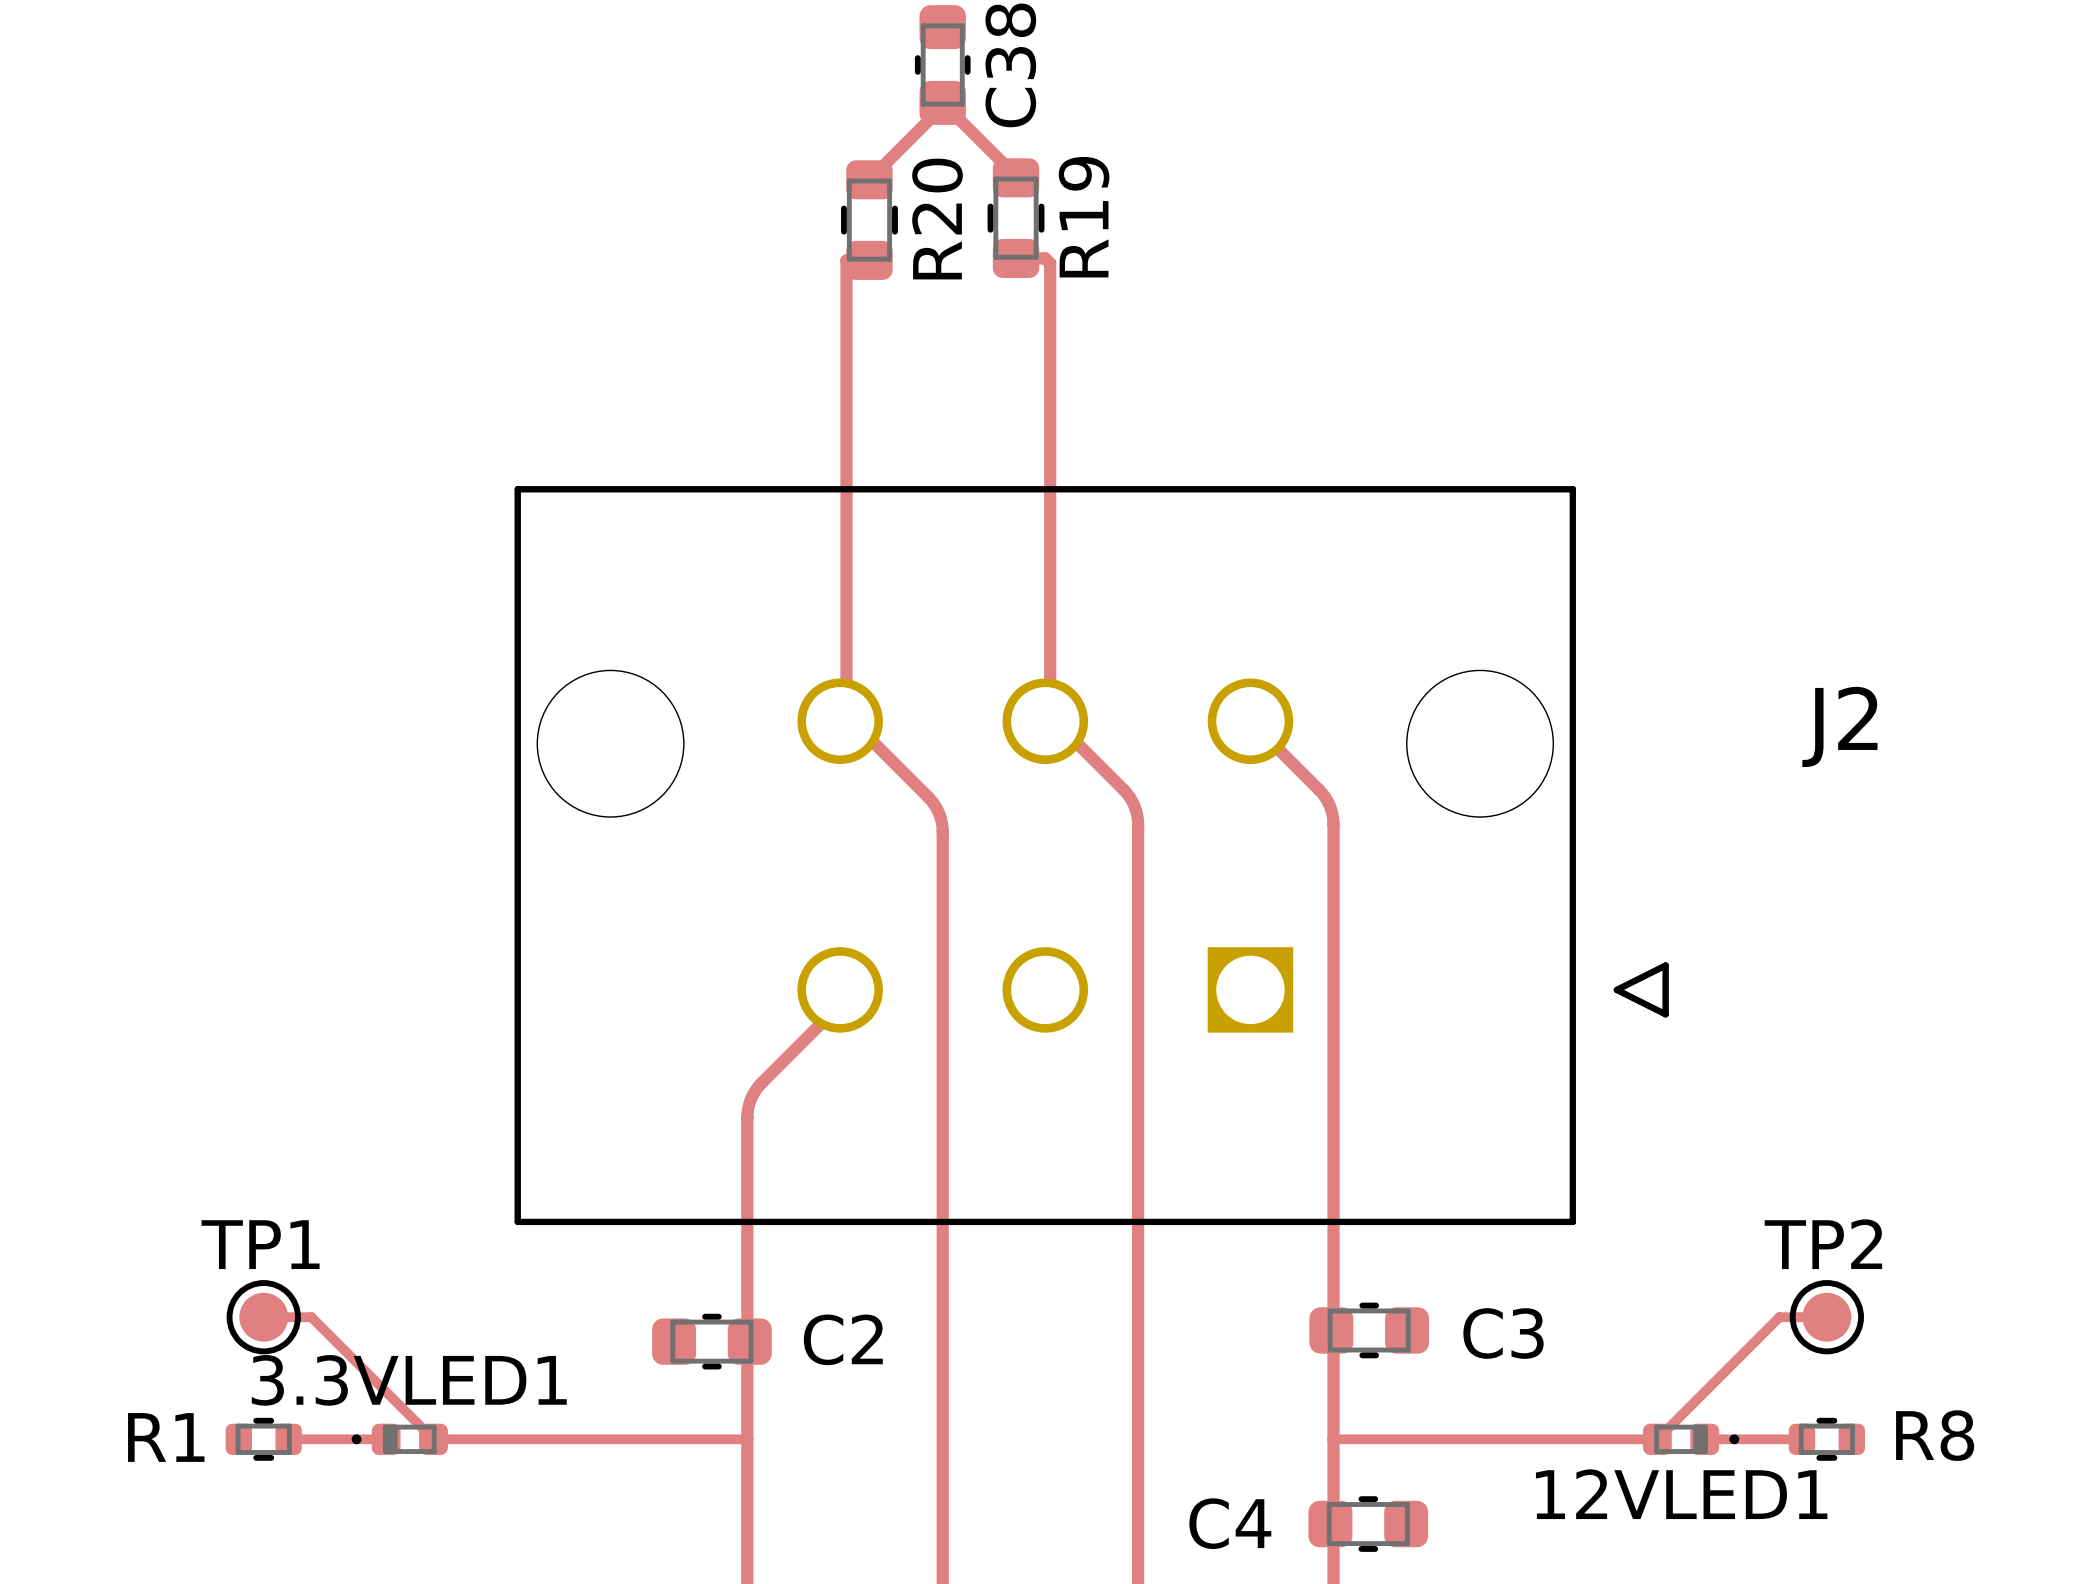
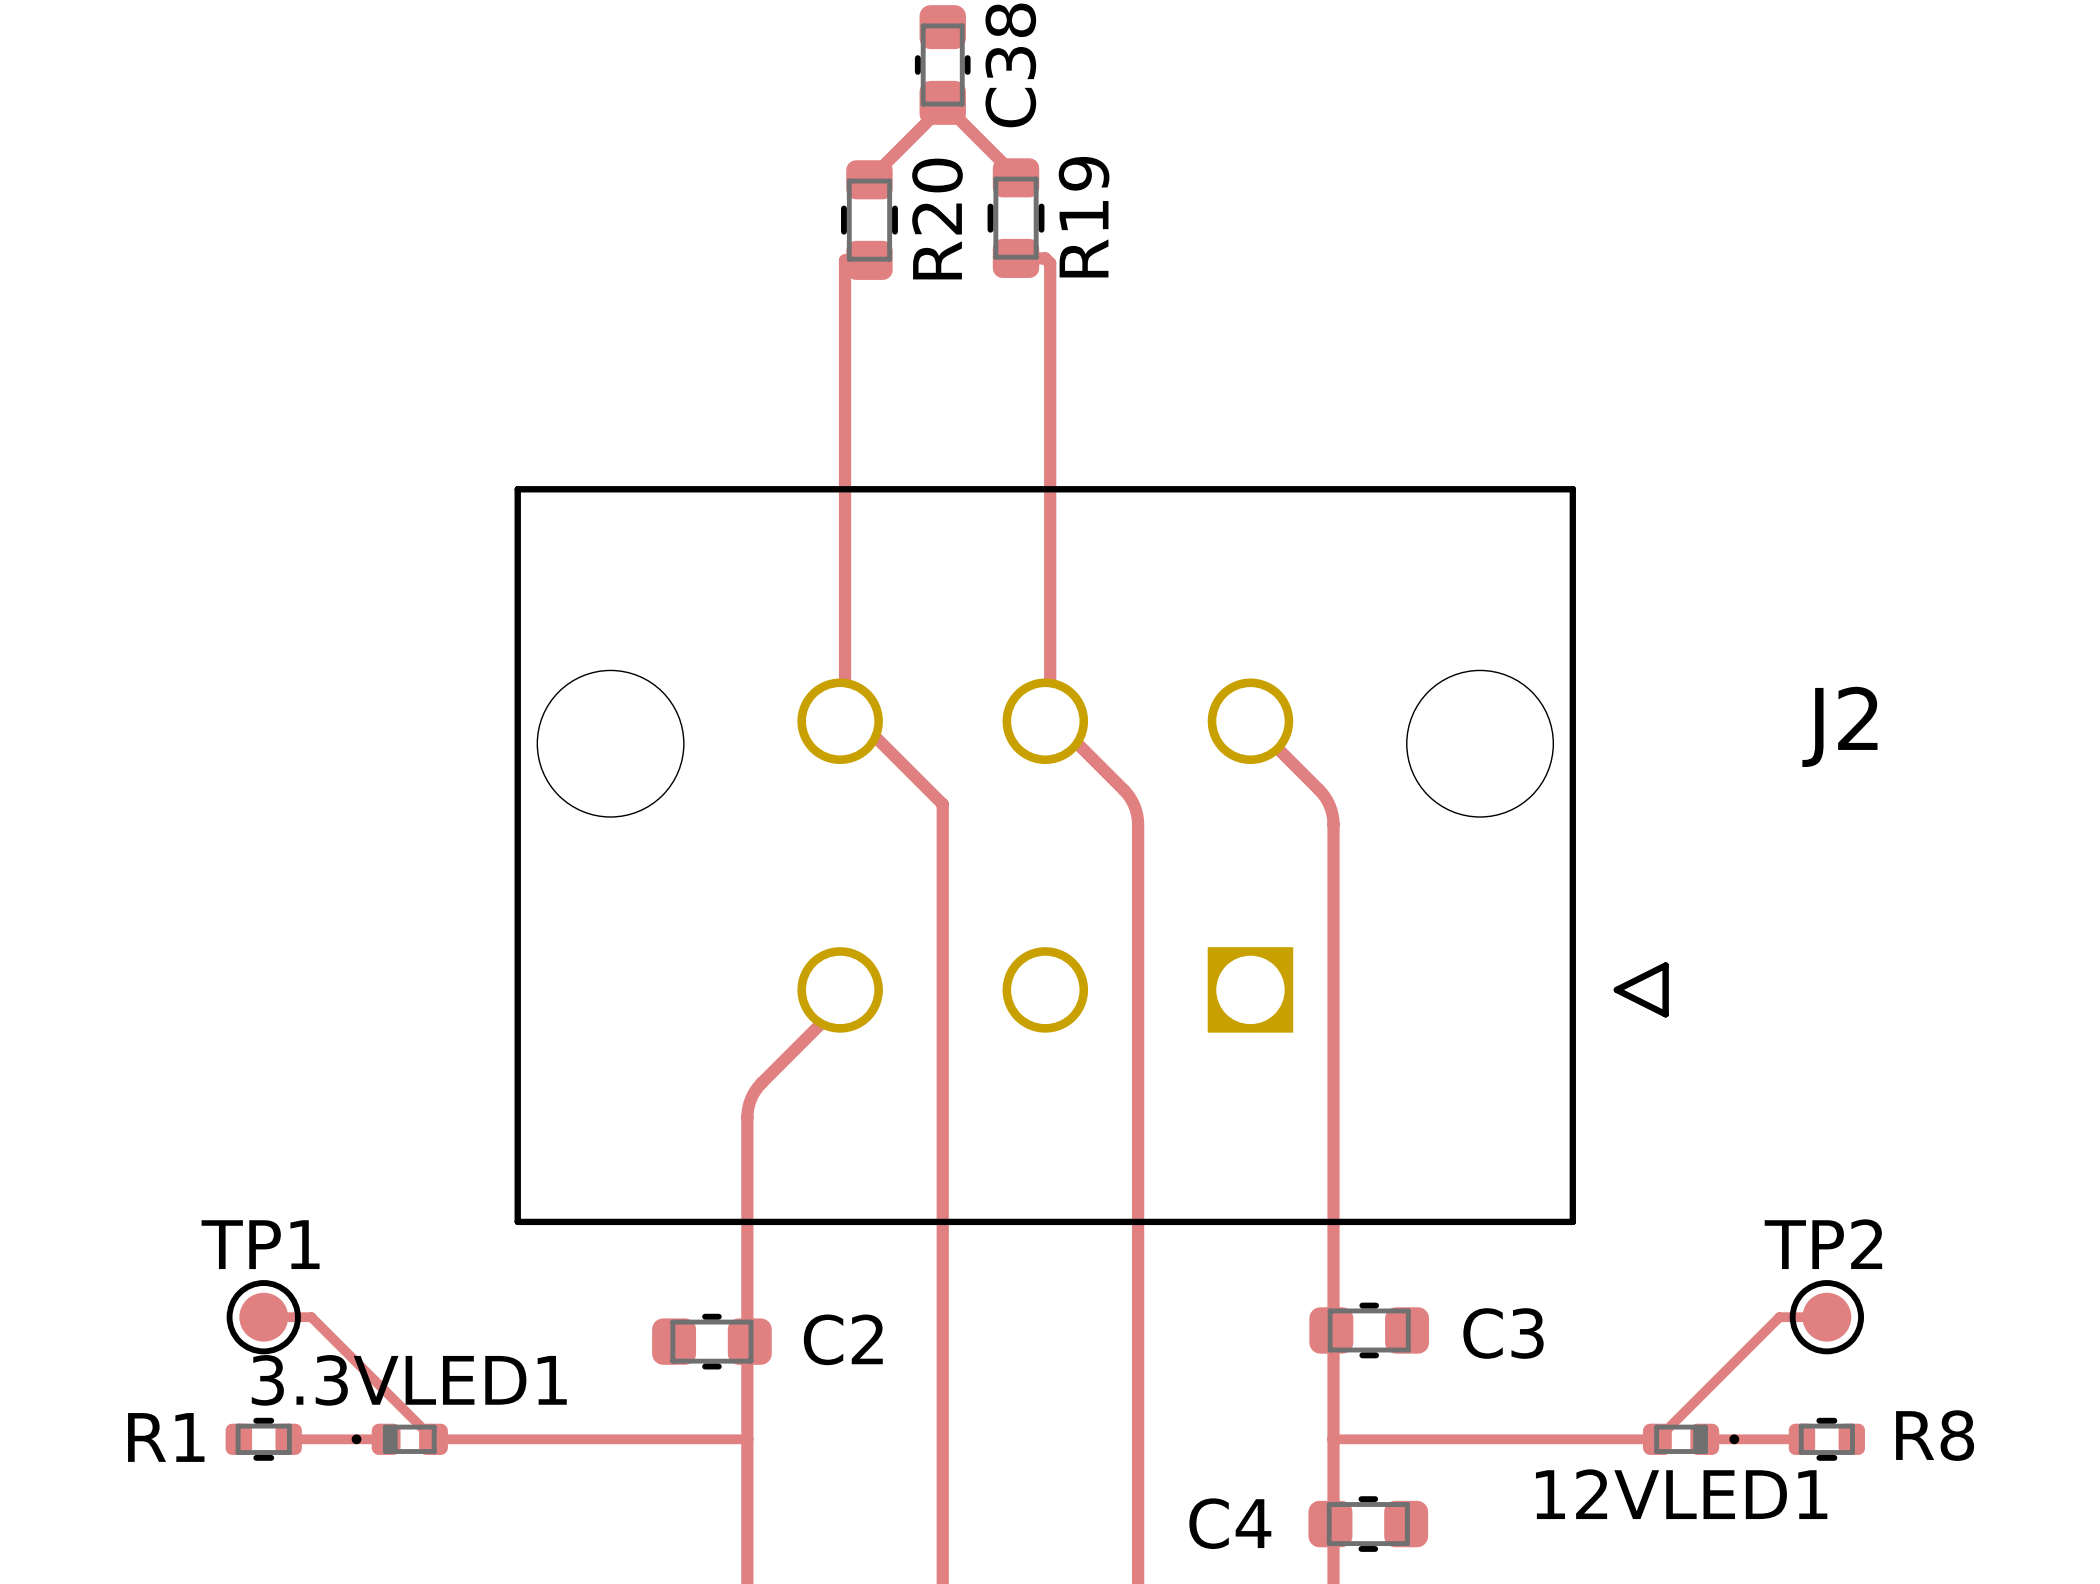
track: (846, 260) (847, 704) (857, 726) (931, 800) (940, 817) (942, 831) -> (846, 260) (845, 731) (869, 731) (942, 804) (942, 831)

